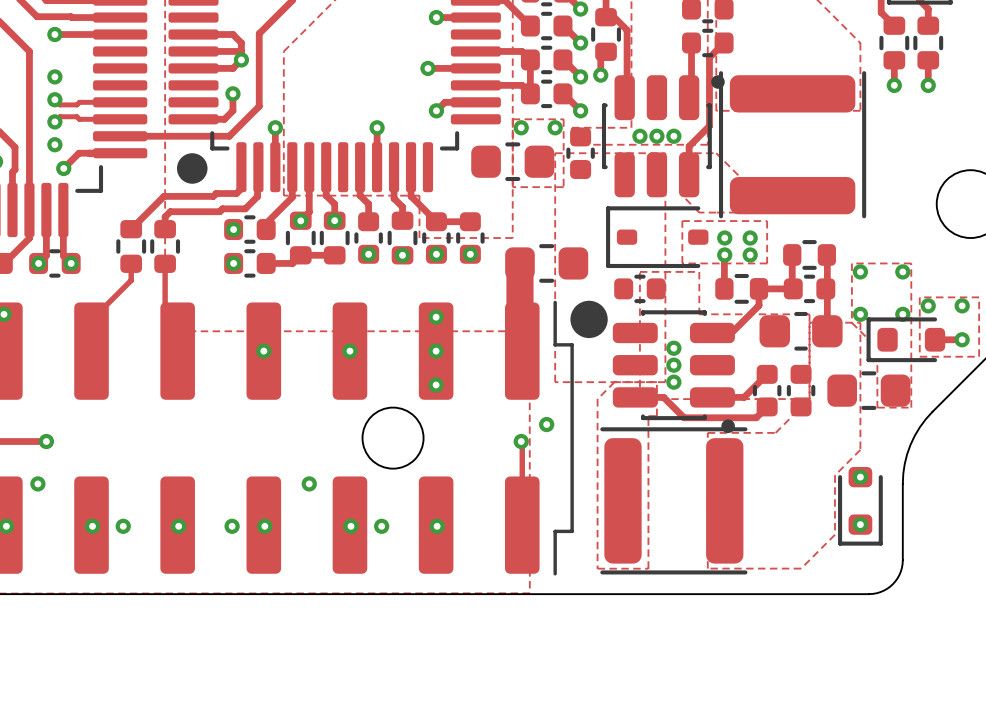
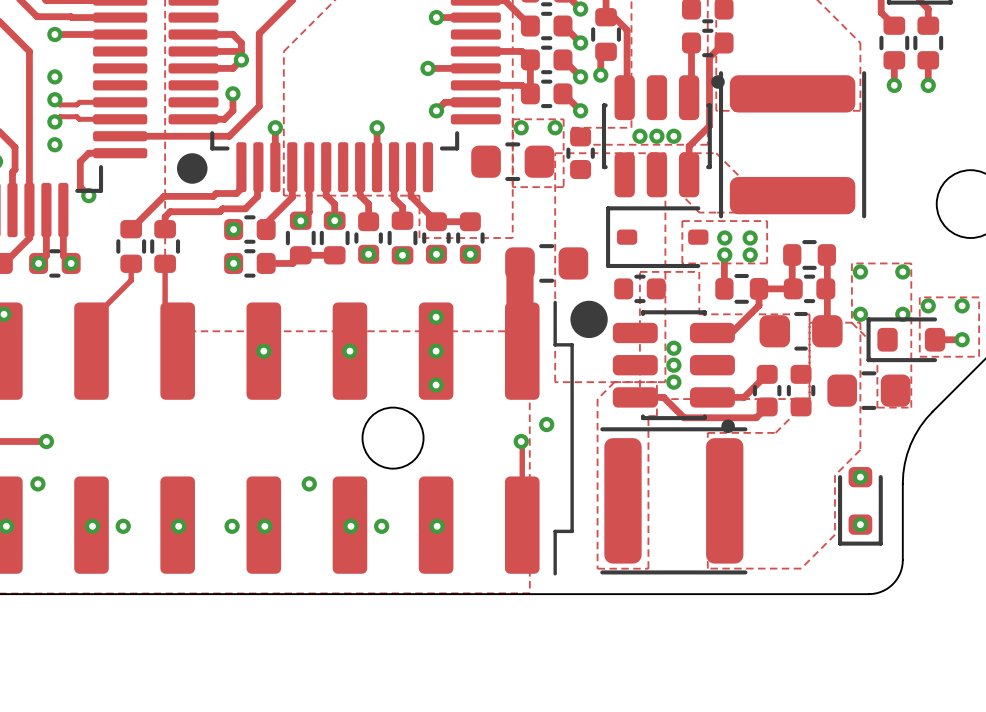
track: (88, 153) (78, 153) (63, 168) -> (88, 153) (80, 161) (80, 187) (88, 195)
via position: (63, 168) -> (88, 195)

